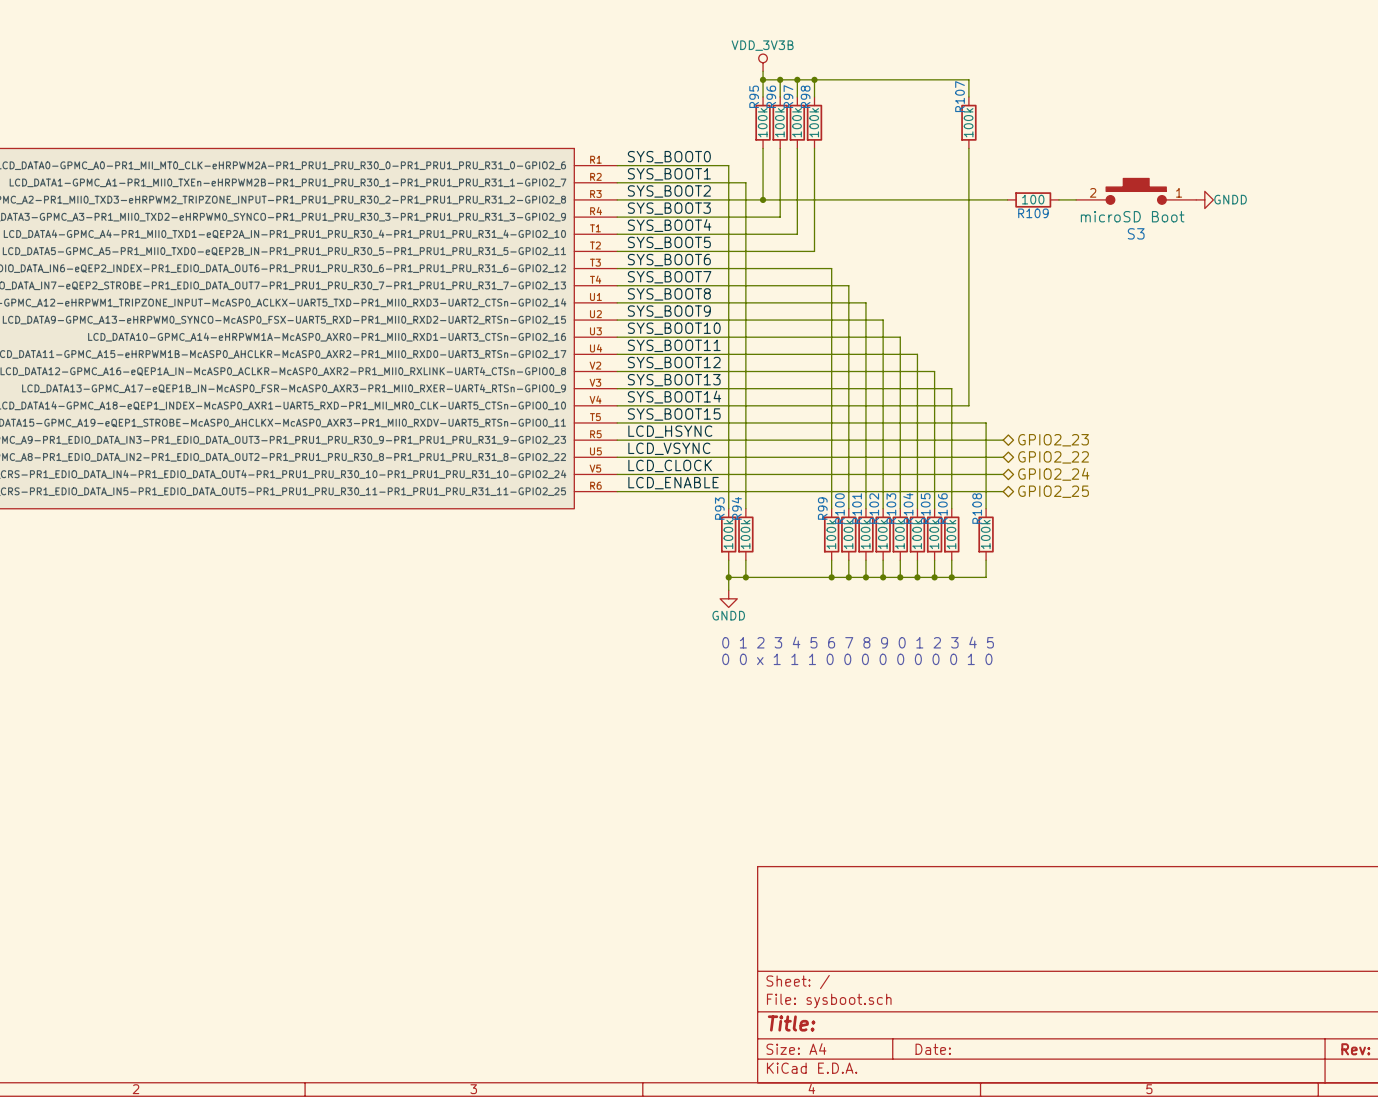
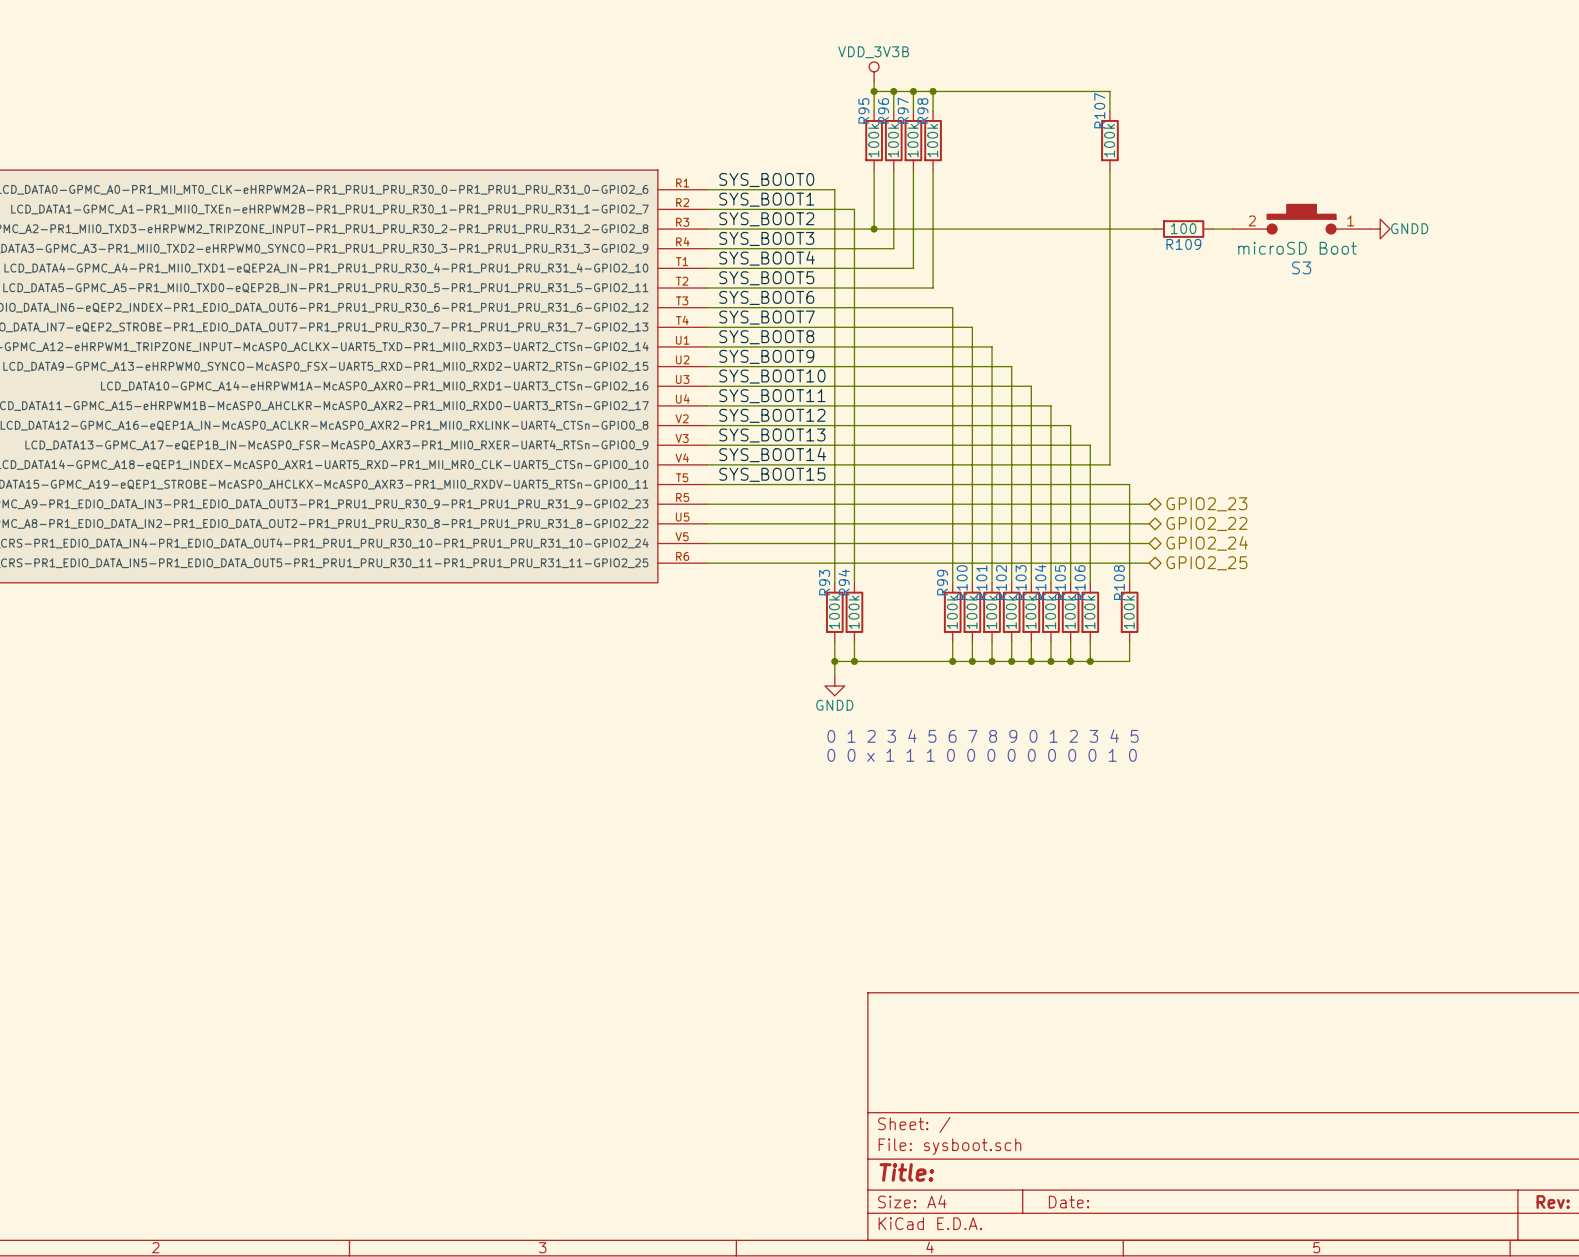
label: LCD_HSYNC (670, 431) -> none
label: LCD_VSYNC (669, 448) -> none
label: LCD_CLOCK (670, 465) -> none
label: LCD_ENABLE (673, 483) -> none

